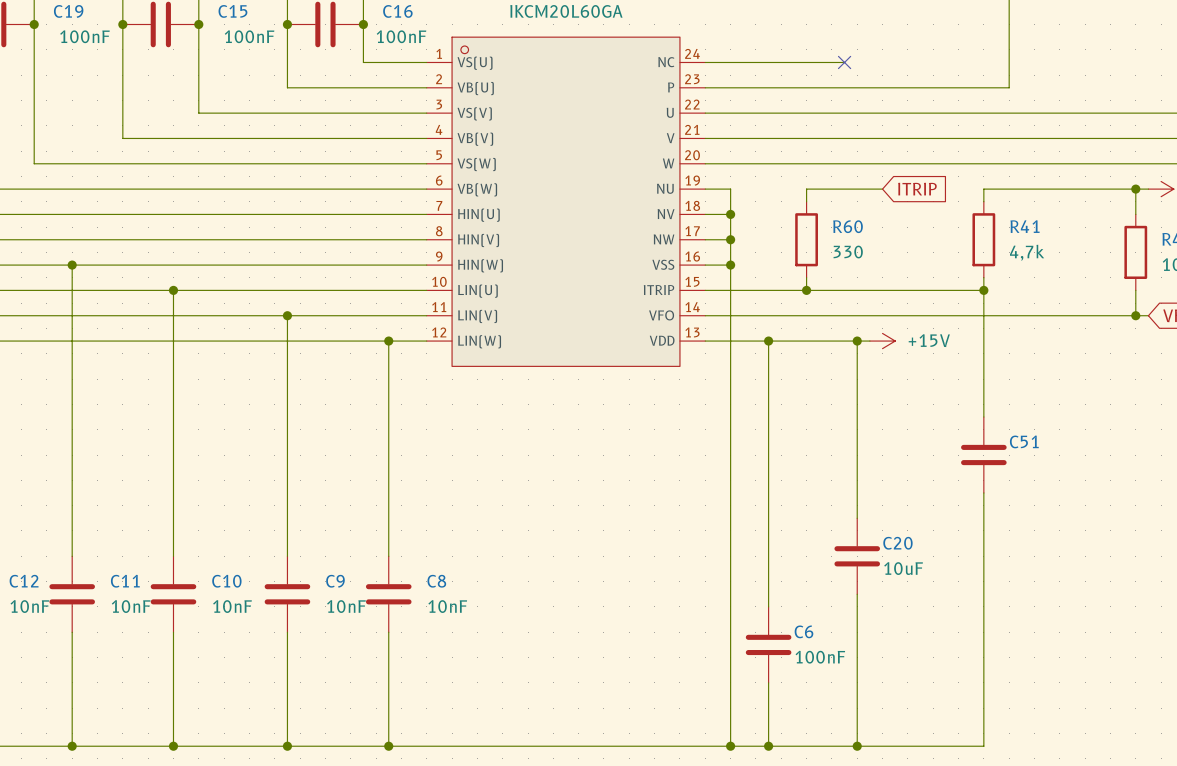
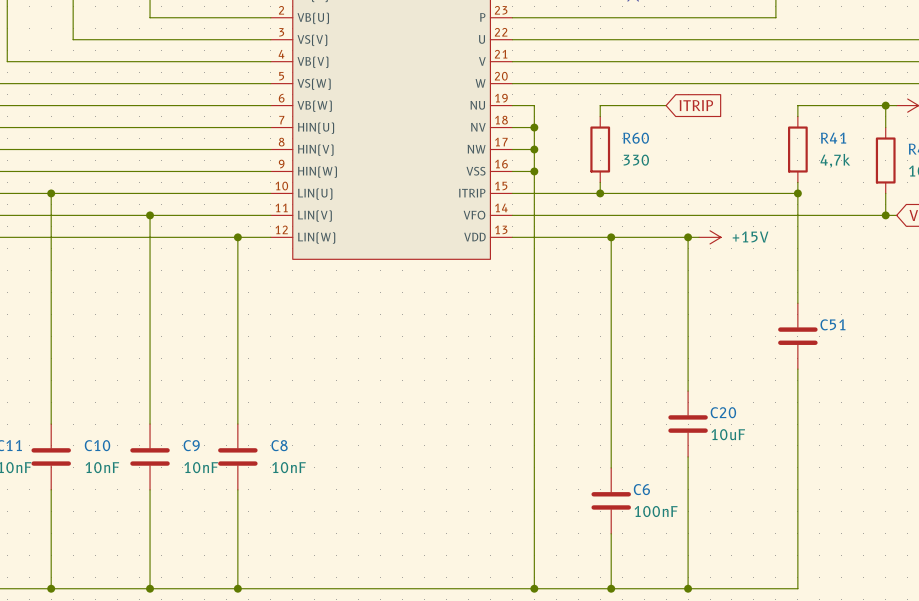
wire: (1034, 189) (983, 189) (983, 201) -> (797, 105) (797, 116)
R41 position: (983, 239) -> (797, 149)
wire: (983, 277) (983, 417) -> (797, 182) (797, 303)
wire: none -> (753, 193) (797, 193)
junction: (983, 290) -> none
junction: none -> (797, 193)
wire: (768, 341) (768, 606) -> (611, 237) (611, 467)
junction: (768, 341) -> none
junction: none -> (611, 237)
wire: (857, 341) (857, 518) -> (688, 237) (688, 391)
junction: (857, 341) -> none
power symbol position: +15V (882, 341) -> +15V (710, 237)
junction: none -> (688, 237)
C51 position: (983, 455) -> (797, 336)
wire: (983, 492) (983, 746) -> (797, 369) (797, 588) (753, 588)
C20 position: (857, 556) -> (688, 424)
wire: (857, 594) (857, 746) -> (688, 456) (688, 588)
C6 position: (768, 644) -> (611, 500)
wire: (768, 682) (768, 746) -> (611, 533) (611, 588)
junction: (768, 746) -> none
junction: none -> (611, 588)
junction: (857, 746) -> none
junction: none -> (688, 588)

